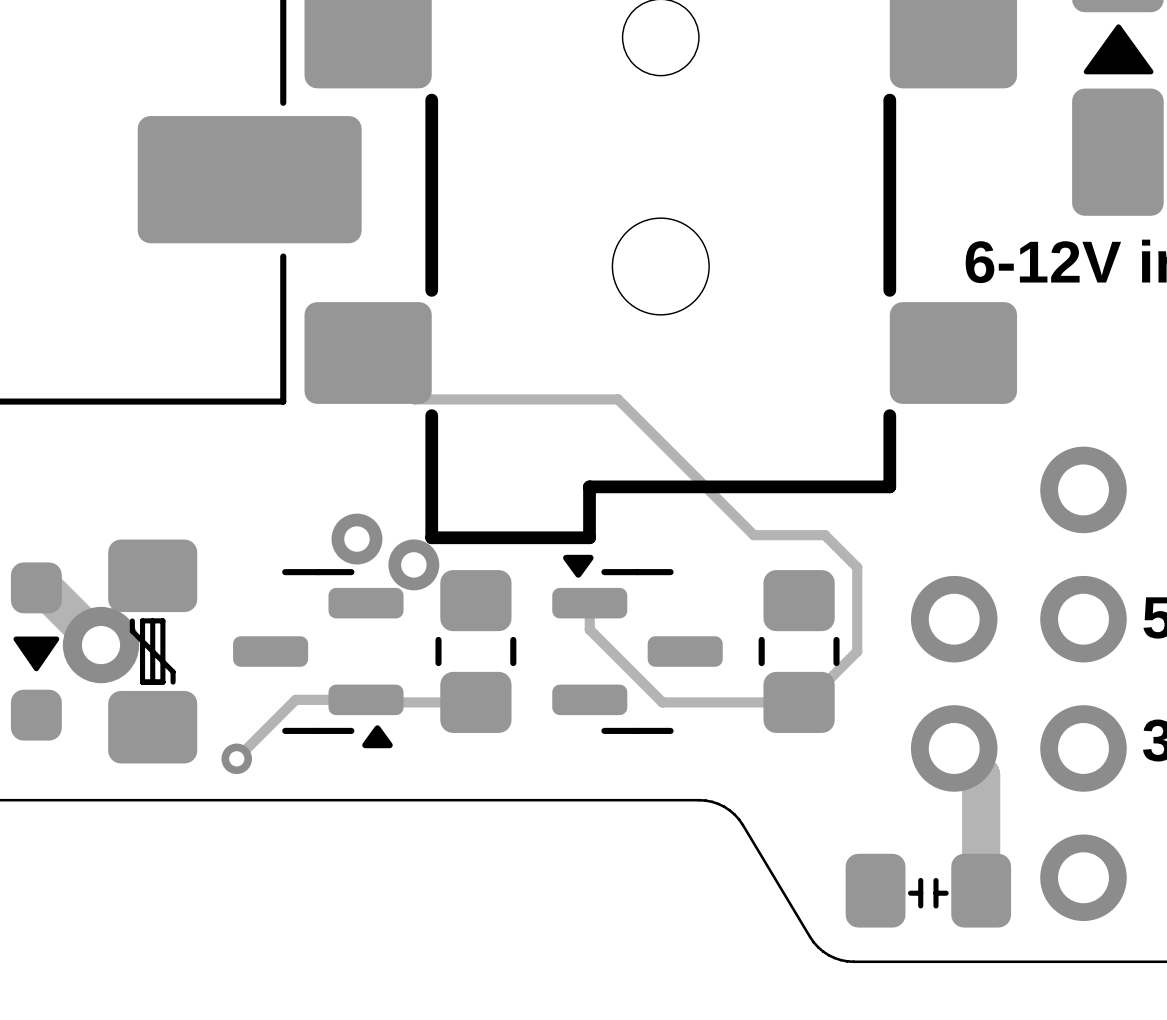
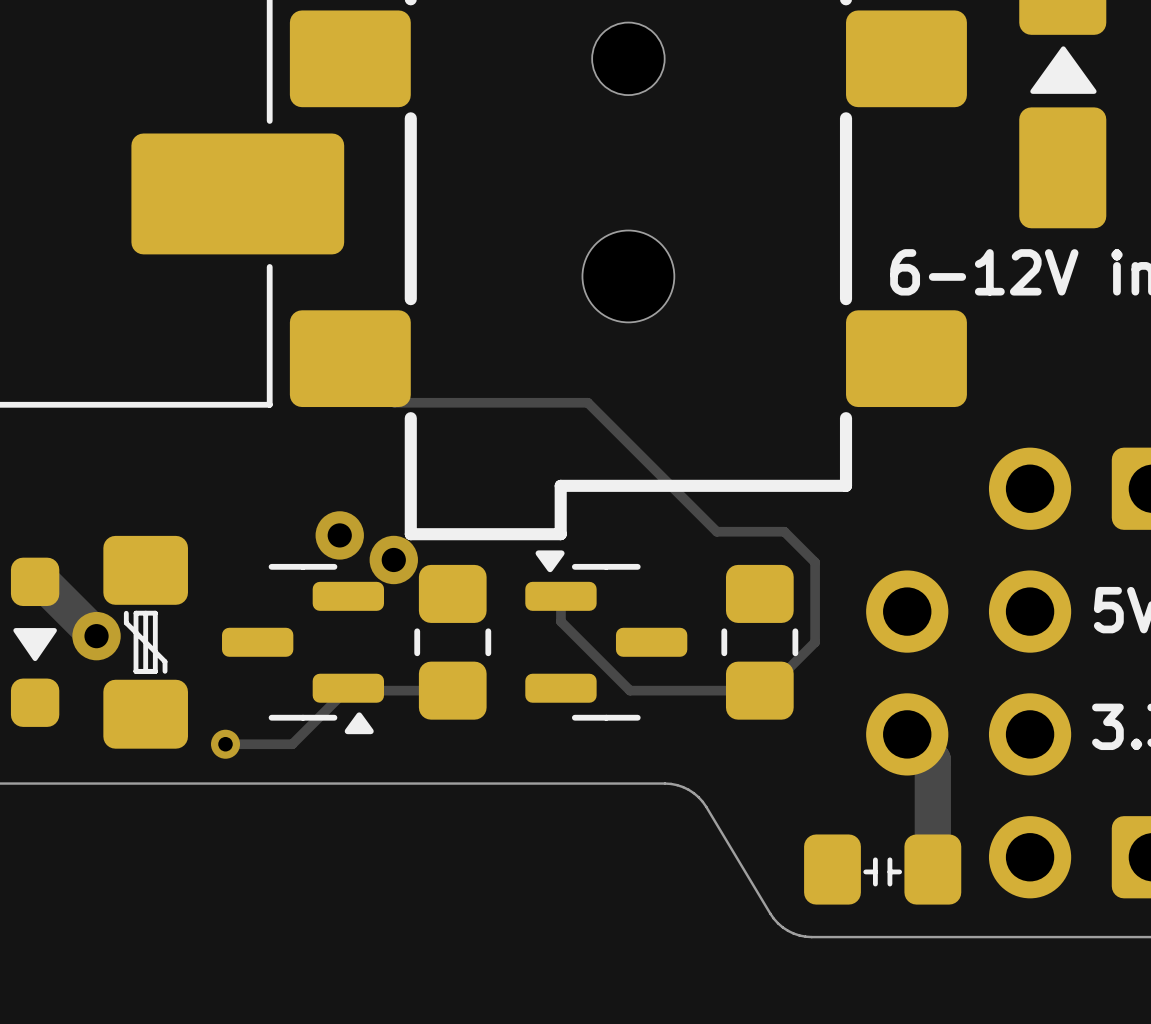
via size: [62, 606, 140, 684] -> [72, 611, 121, 661]
track: (366, 699) (295, 699) (236, 758) -> (348, 688) (292, 744) (221, 744)

